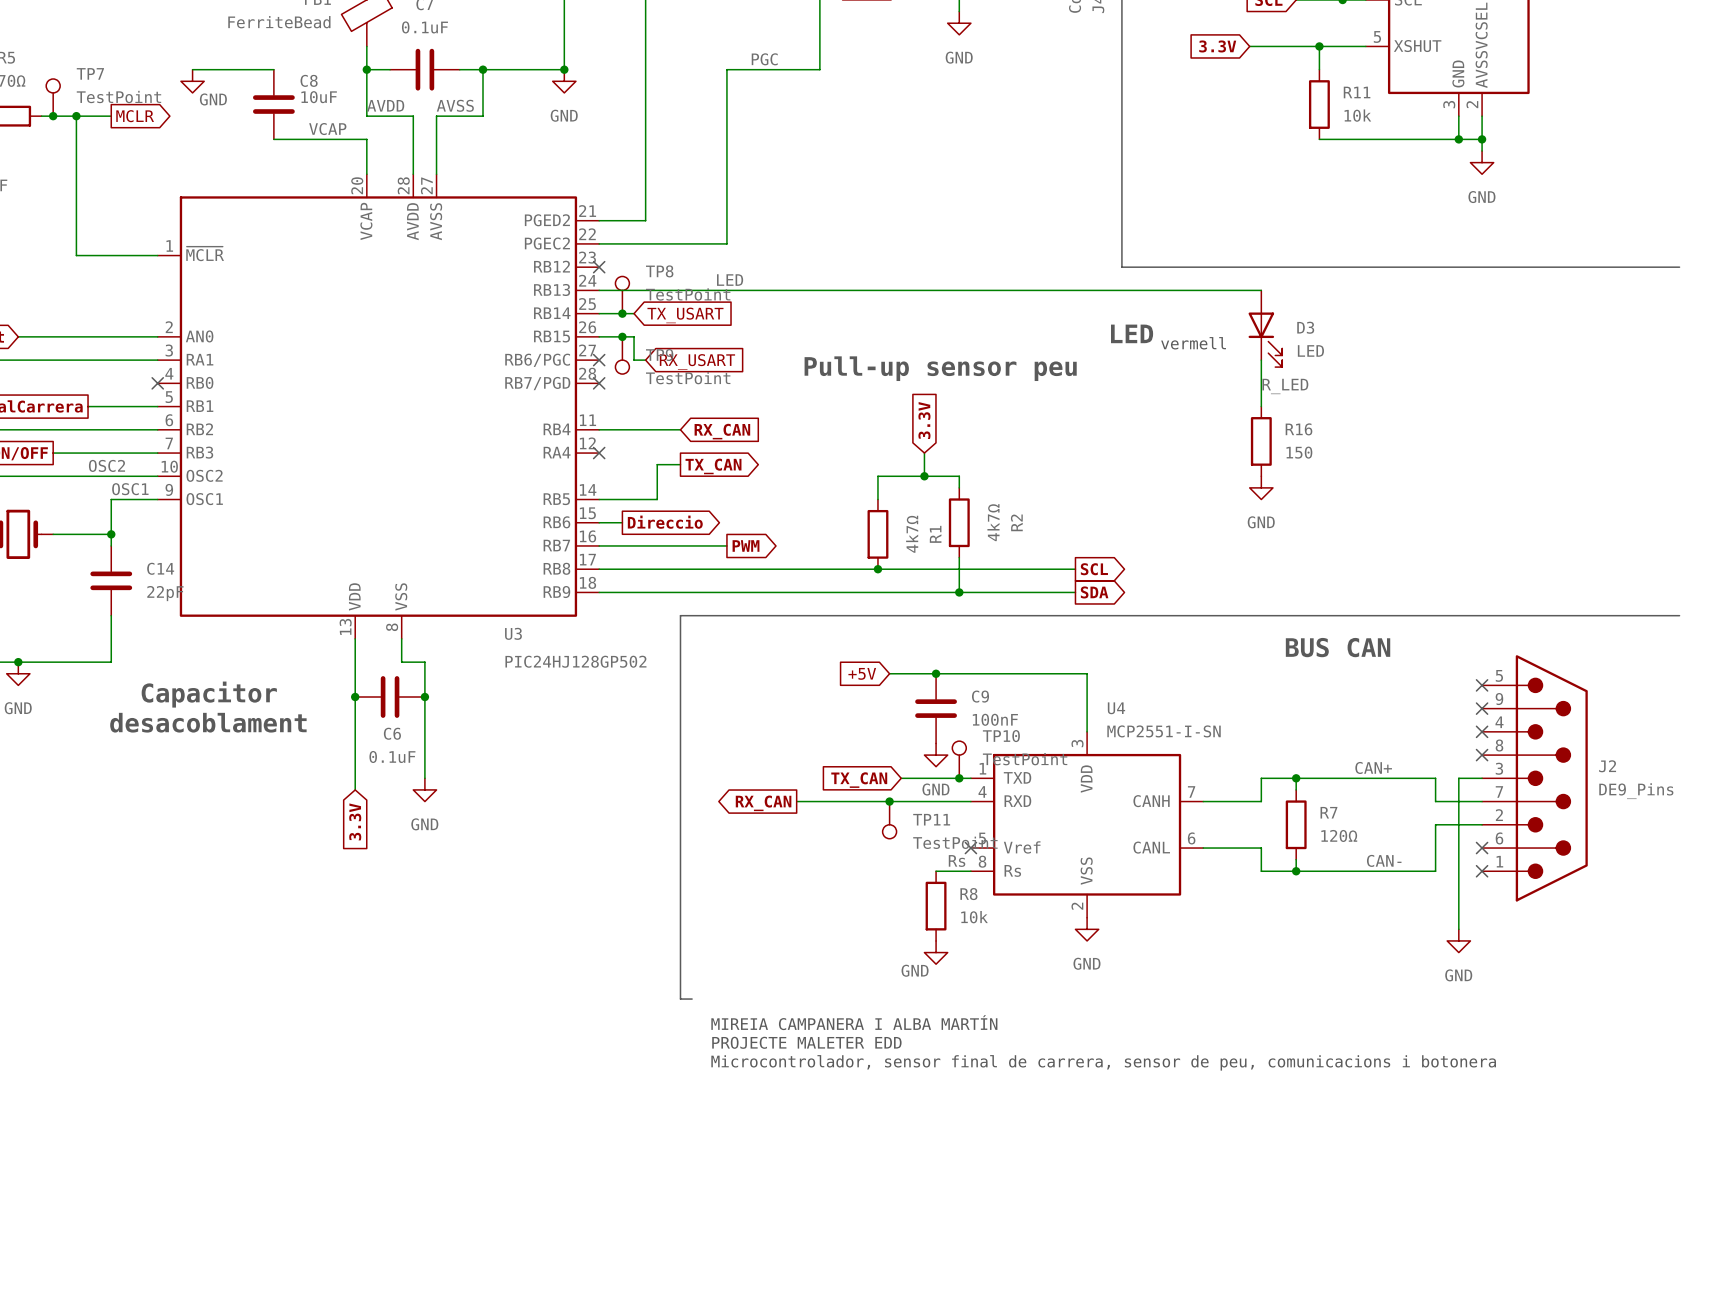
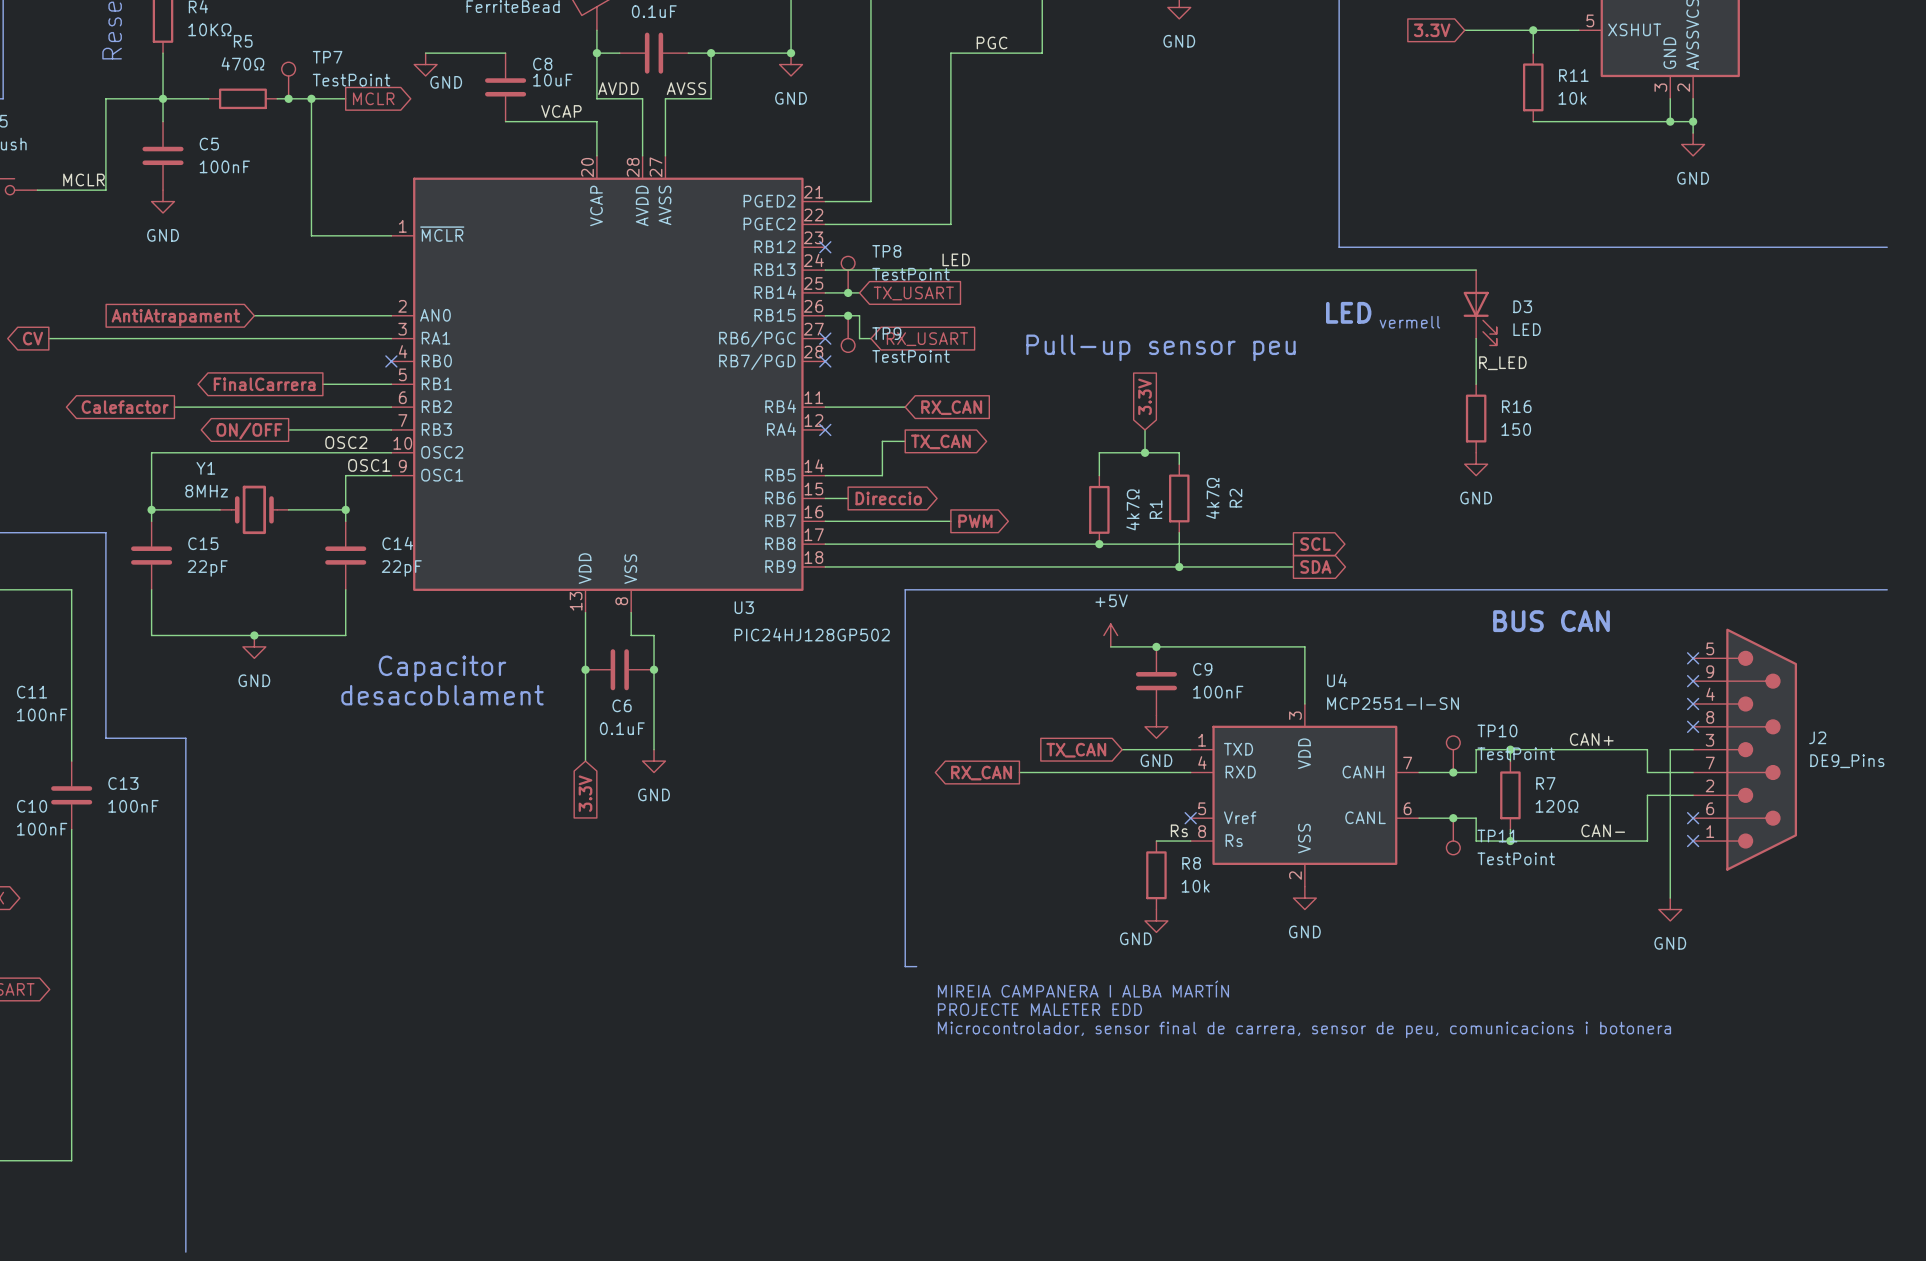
power symbol: none -> +5V (1110, 635)
global label: +5V (862, 673) -> none
TP10 position: (959, 759) -> (1453, 754)
junction: (959, 778) -> none
junction: (889, 801) -> none
junction: none -> (1453, 772)
TP11 position: (889, 820) -> (1453, 836)
junction: none -> (1453, 818)

